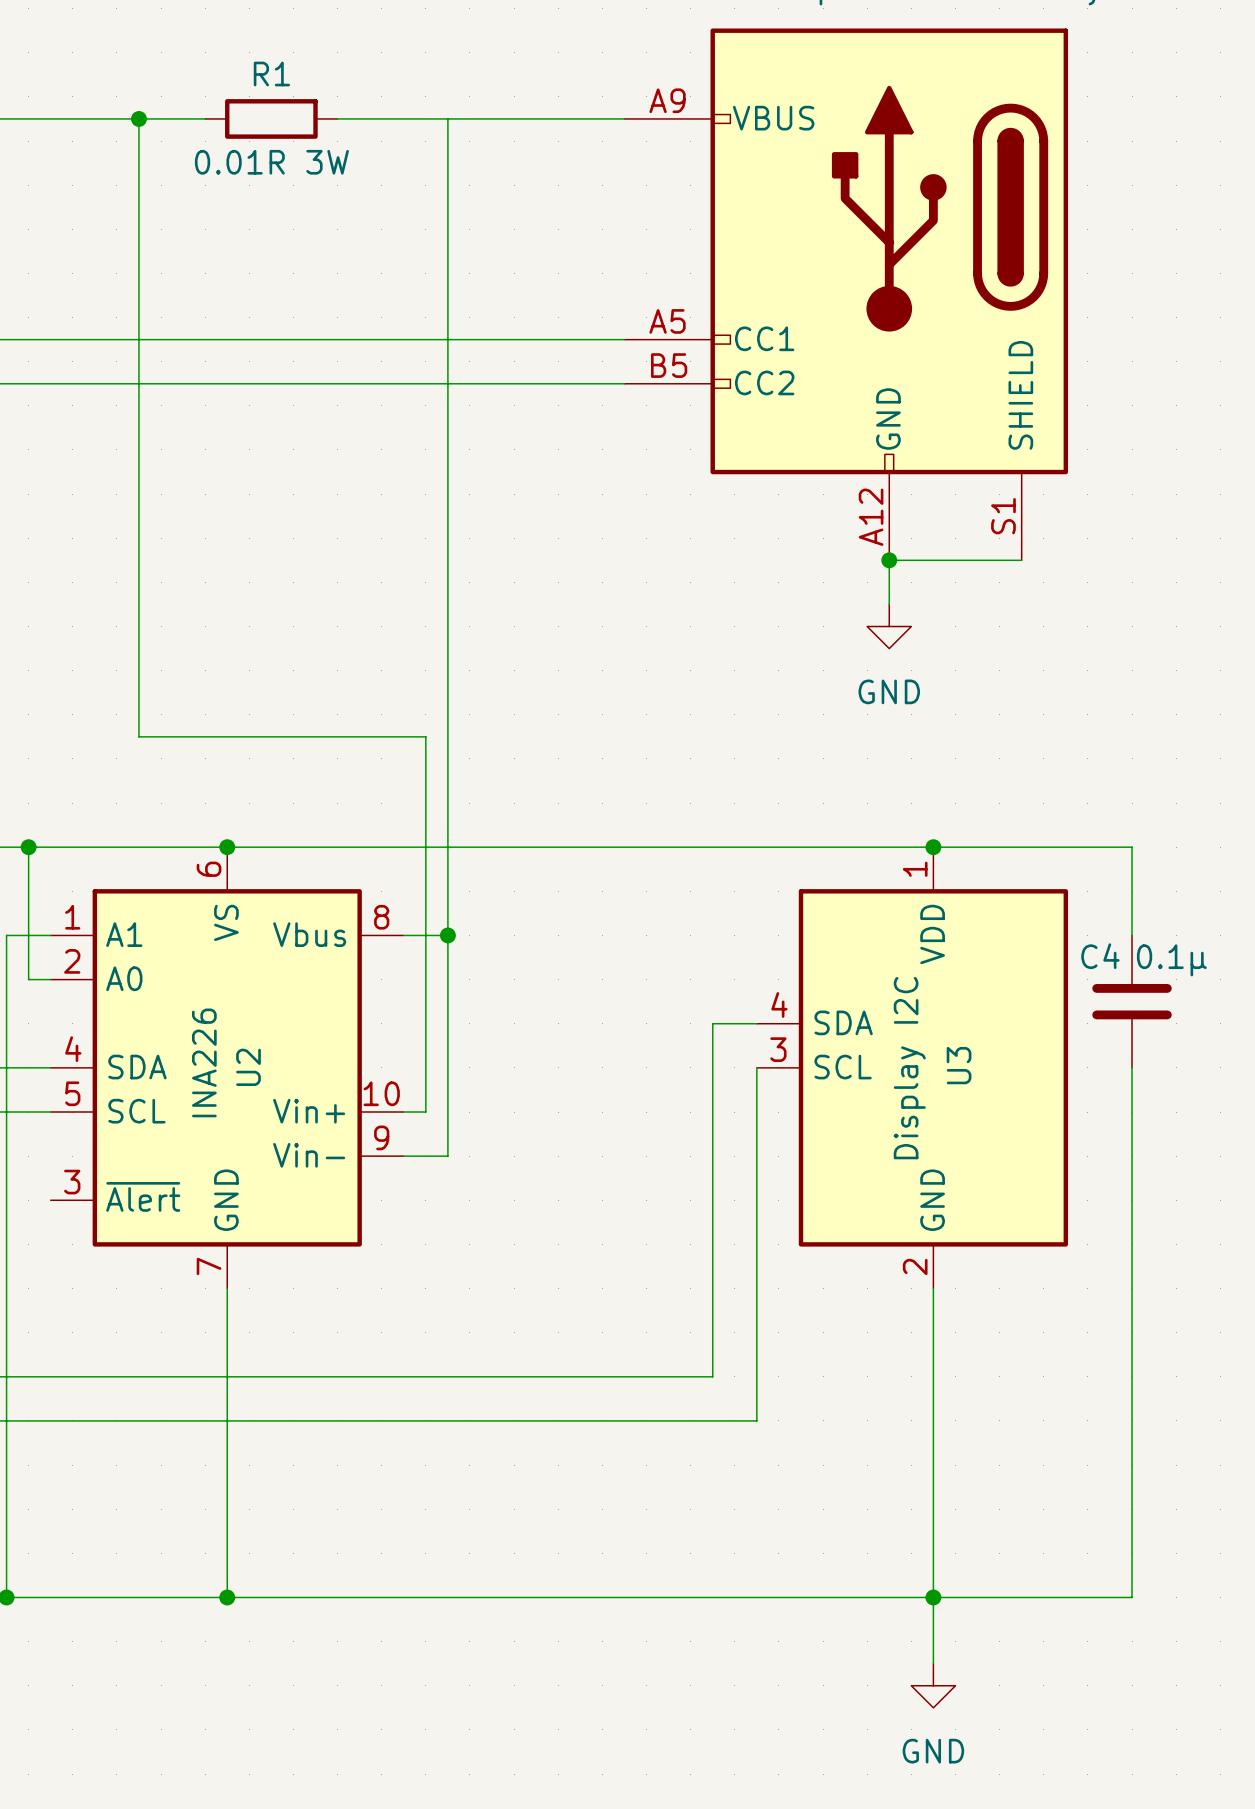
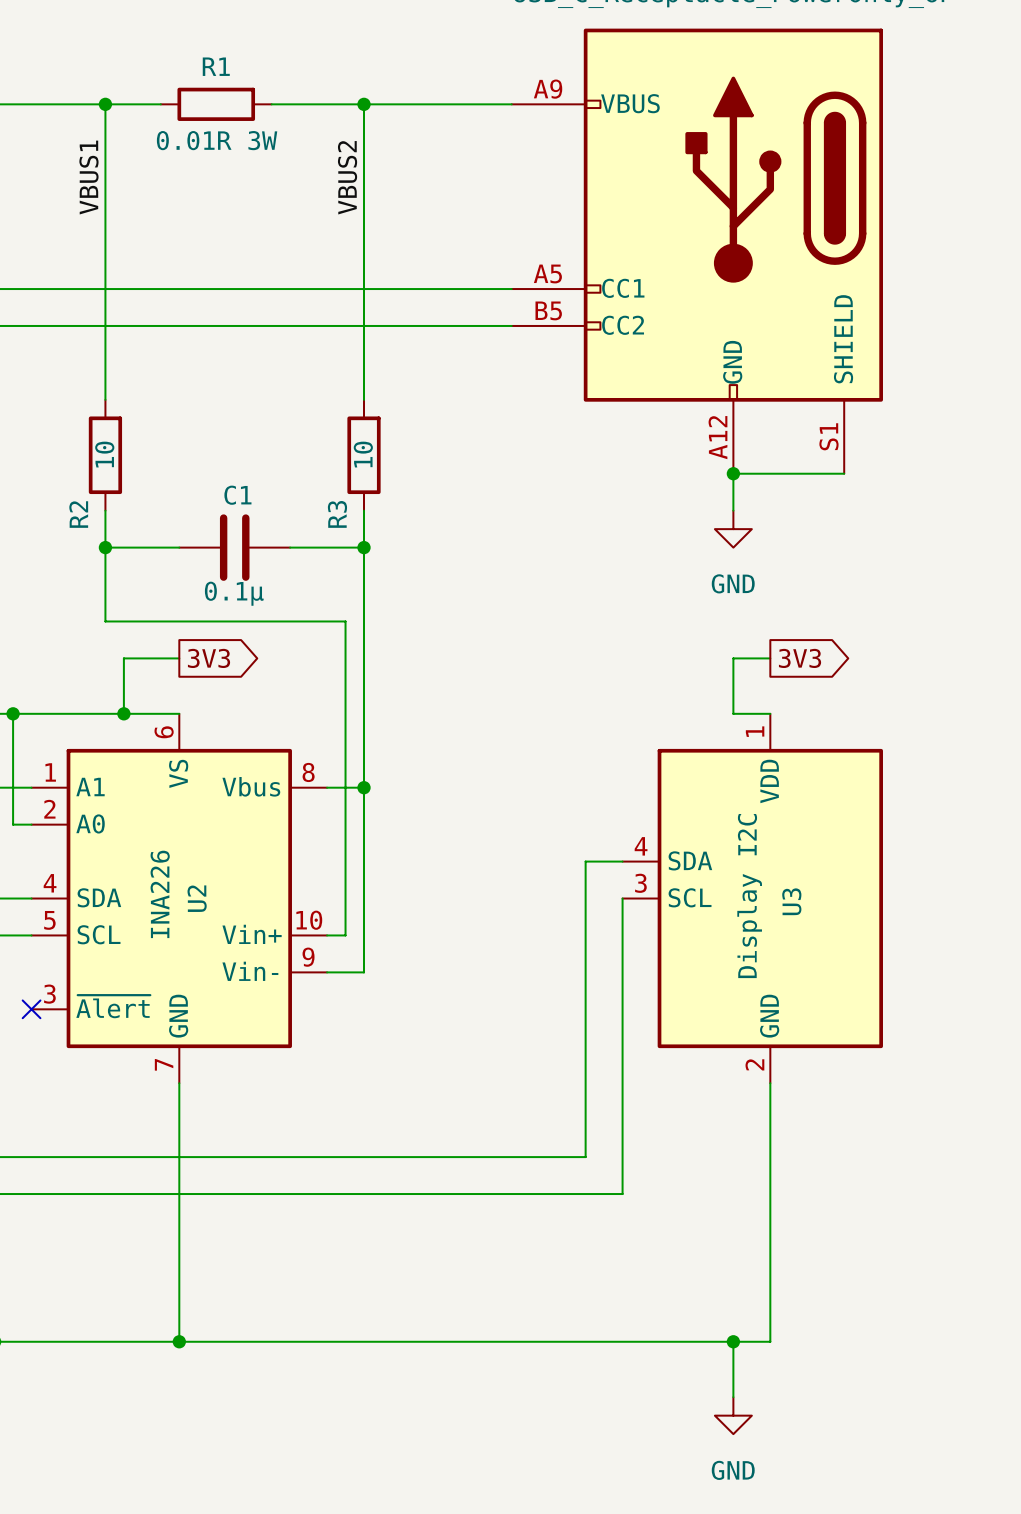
junction: none -> (364, 104)
label: none -> VBUS1 (88, 177)
label: none -> VBUS2 (347, 177)
wire: (138, 472) (138, 604) -> none
wire: (447, 472) (447, 604) -> none
R2: none -> 10 (105, 455)
R3: none -> 10 (364, 455)
wire: none -> (105, 547) (179, 547)
junction: none -> (105, 547)
C1: none -> 0.1µ (234, 547)
wire: none -> (290, 547) (364, 547)
junction: none -> (364, 547)
wire: none -> (179, 658) (123, 658) (123, 713)
global label: none -> 3V3 (209, 658)
global label: none -> 3V3 (800, 658)
wire: (227, 847) (889, 847) -> (770, 658) (733, 658) (733, 713)
junction position: (227, 847) -> (123, 713)
wire: (933, 847) (1132, 847) (1132, 935) -> none
junction: (933, 847) -> none
C4: 0.1µ (1132, 1001) -> none
wire: (1132, 1067) (1132, 1597) (933, 1597) (933, 1663) -> none
no-connect mark: none -> (31, 1009)
wire: none -> (733, 1341) (733, 1397)
junction position: (933, 1597) -> (733, 1341)
power symbol position: GND (933, 1685) -> GND (733, 1415)

